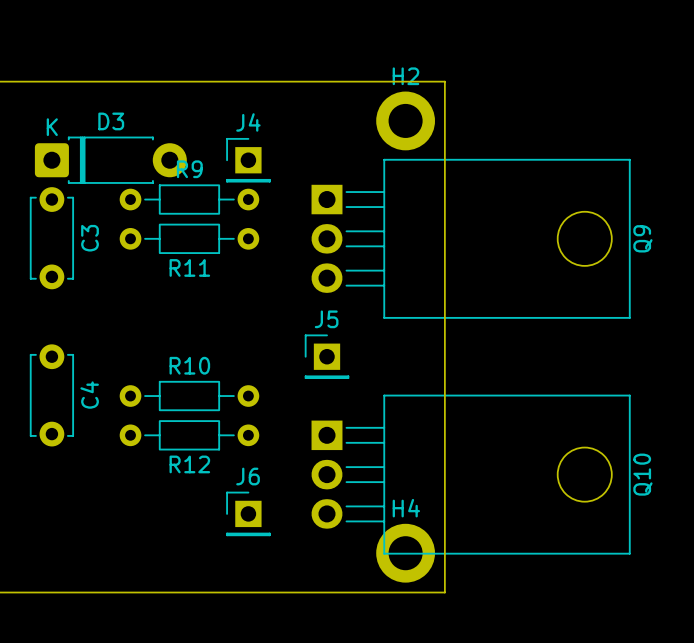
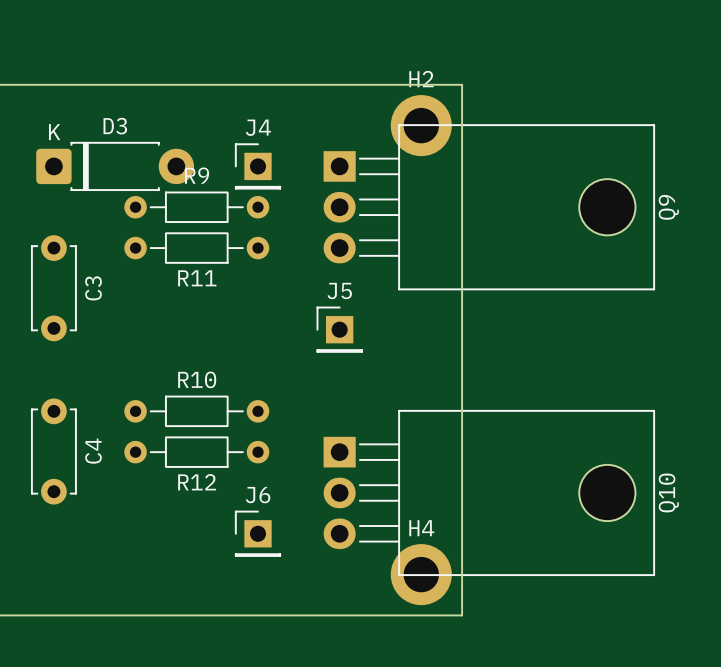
C3 position: (51, 238) -> (53, 288)
Q9 position: (471, 238) -> (489, 207)
J5 position: (327, 356) -> (339, 329)
C4 position: (51, 395) -> (53, 451)

